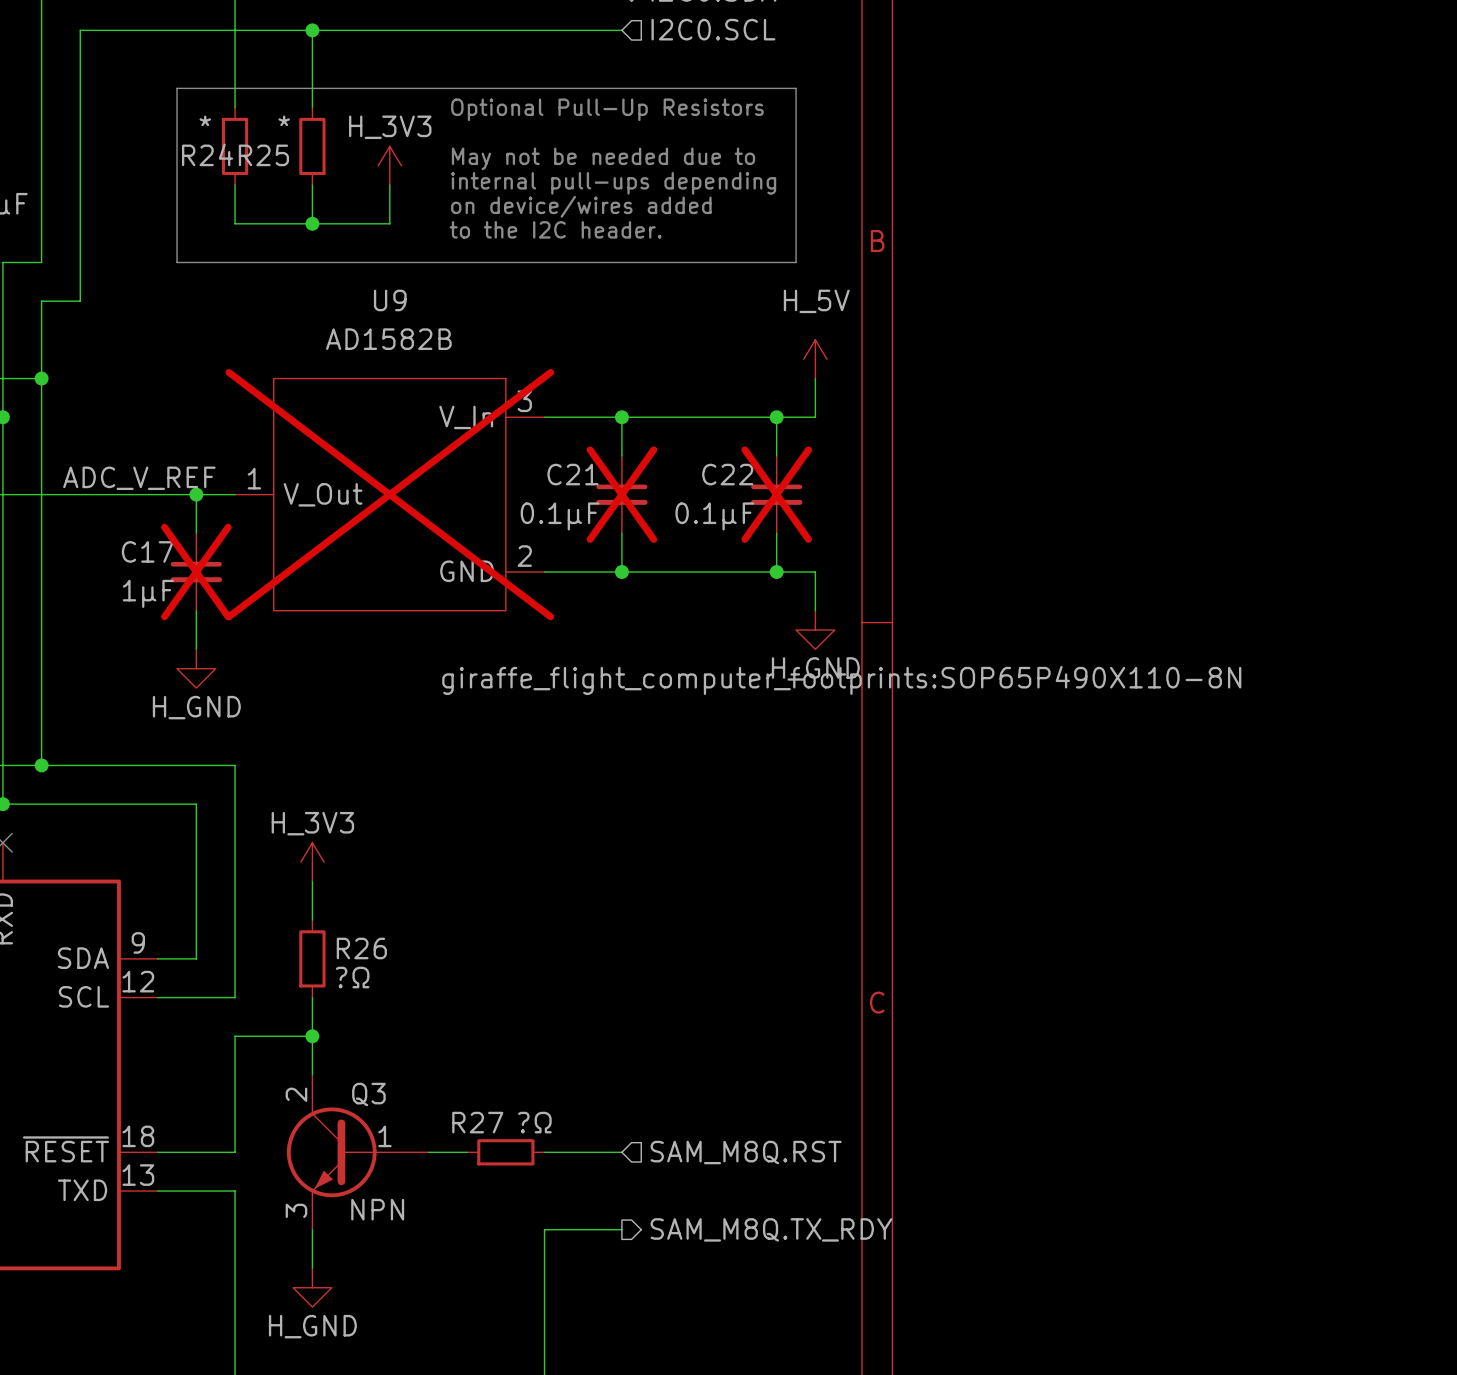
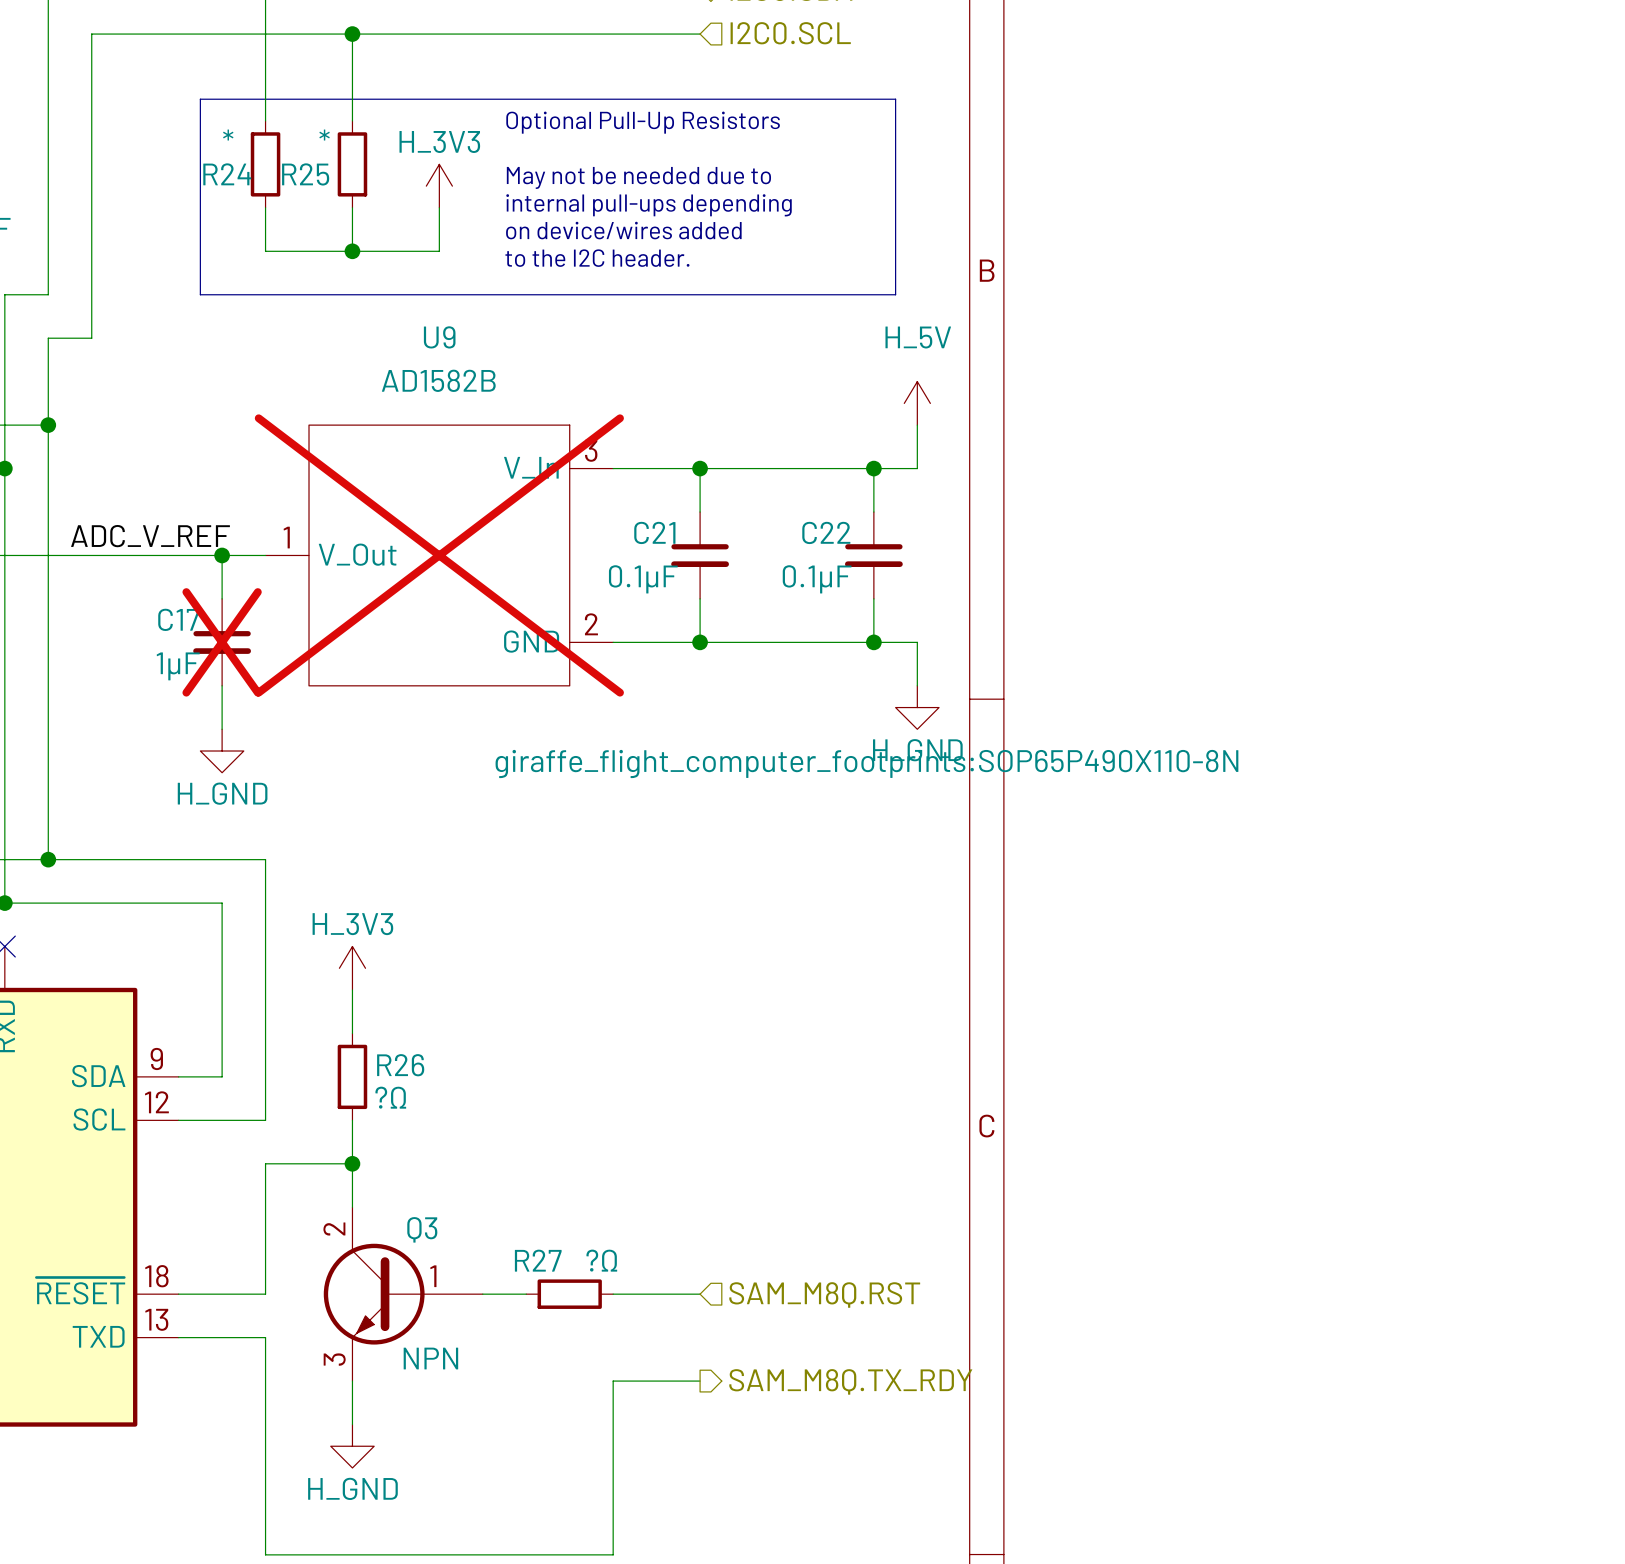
C21 do-not-place cross: (621, 494) -> none
C22 do-not-place cross: (776, 494) -> none

